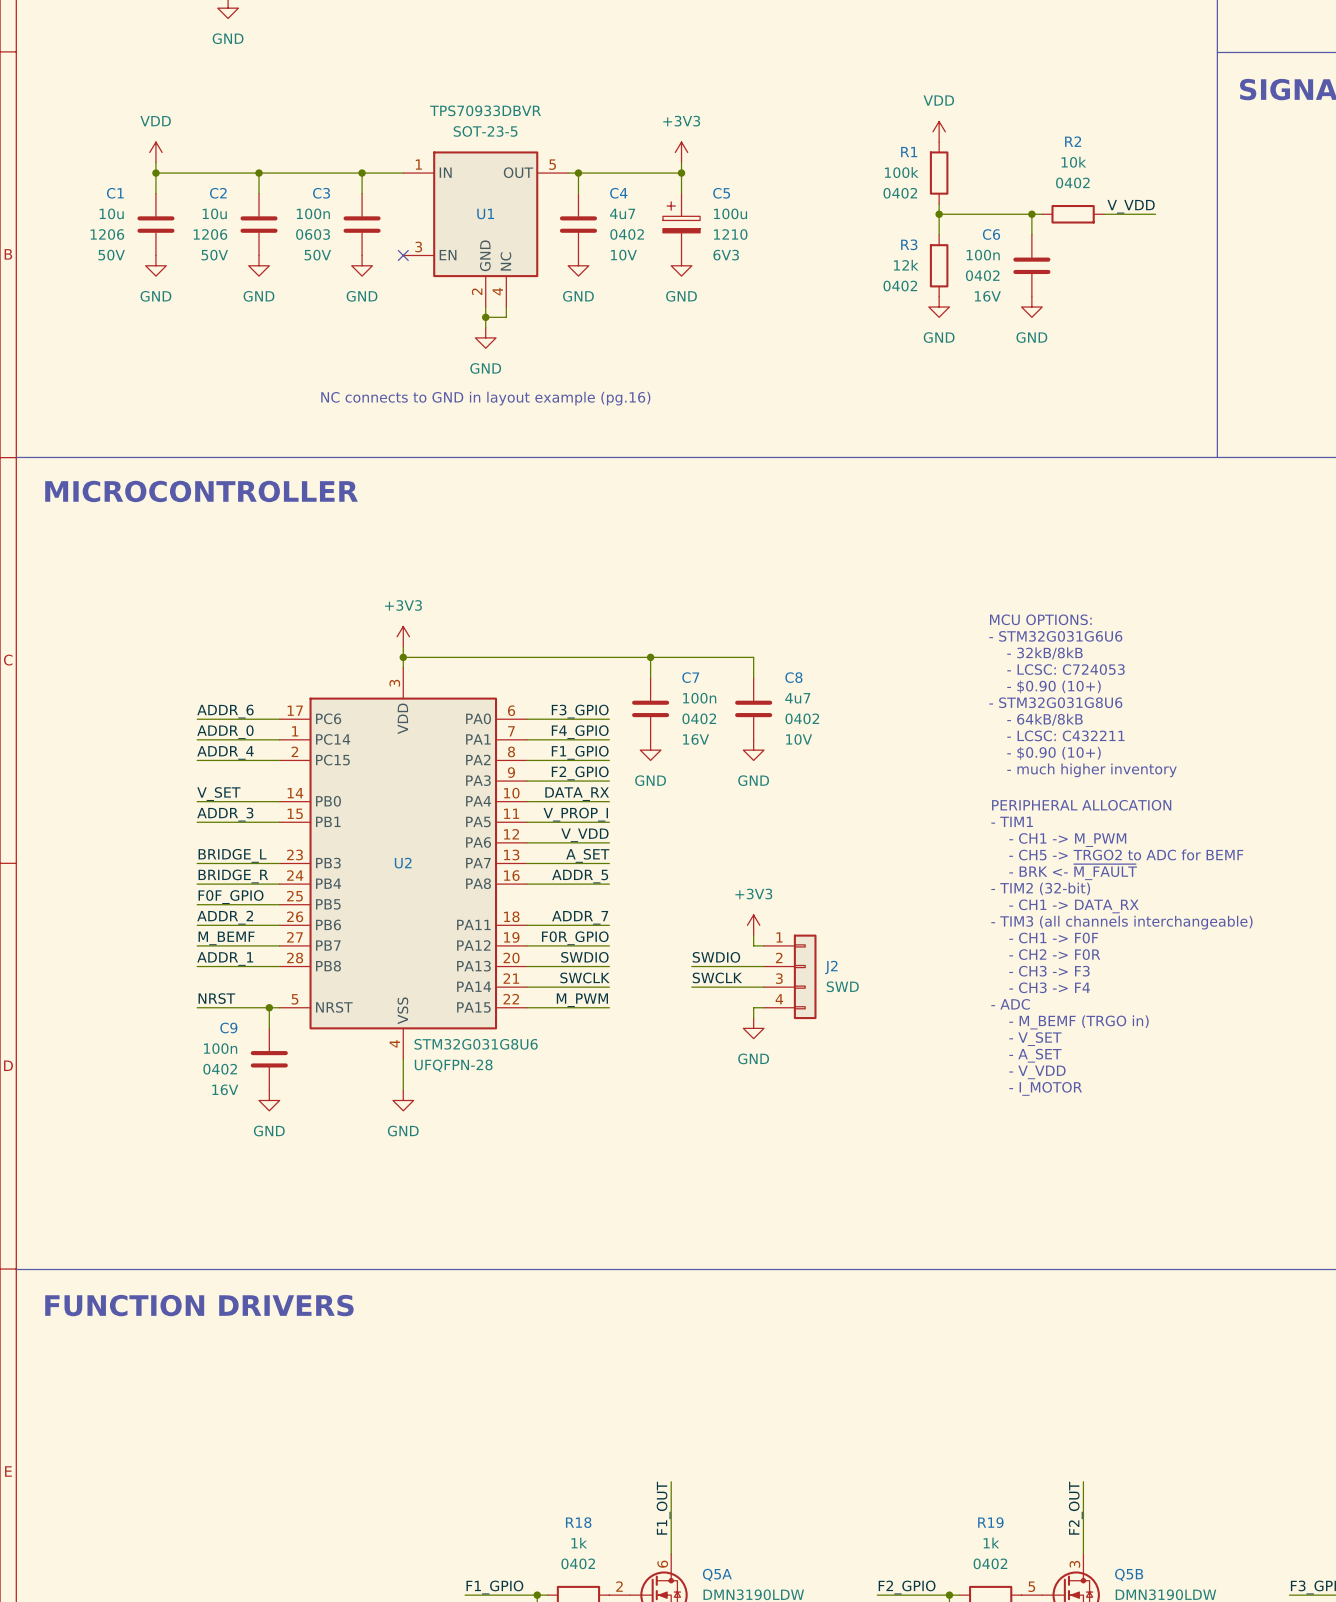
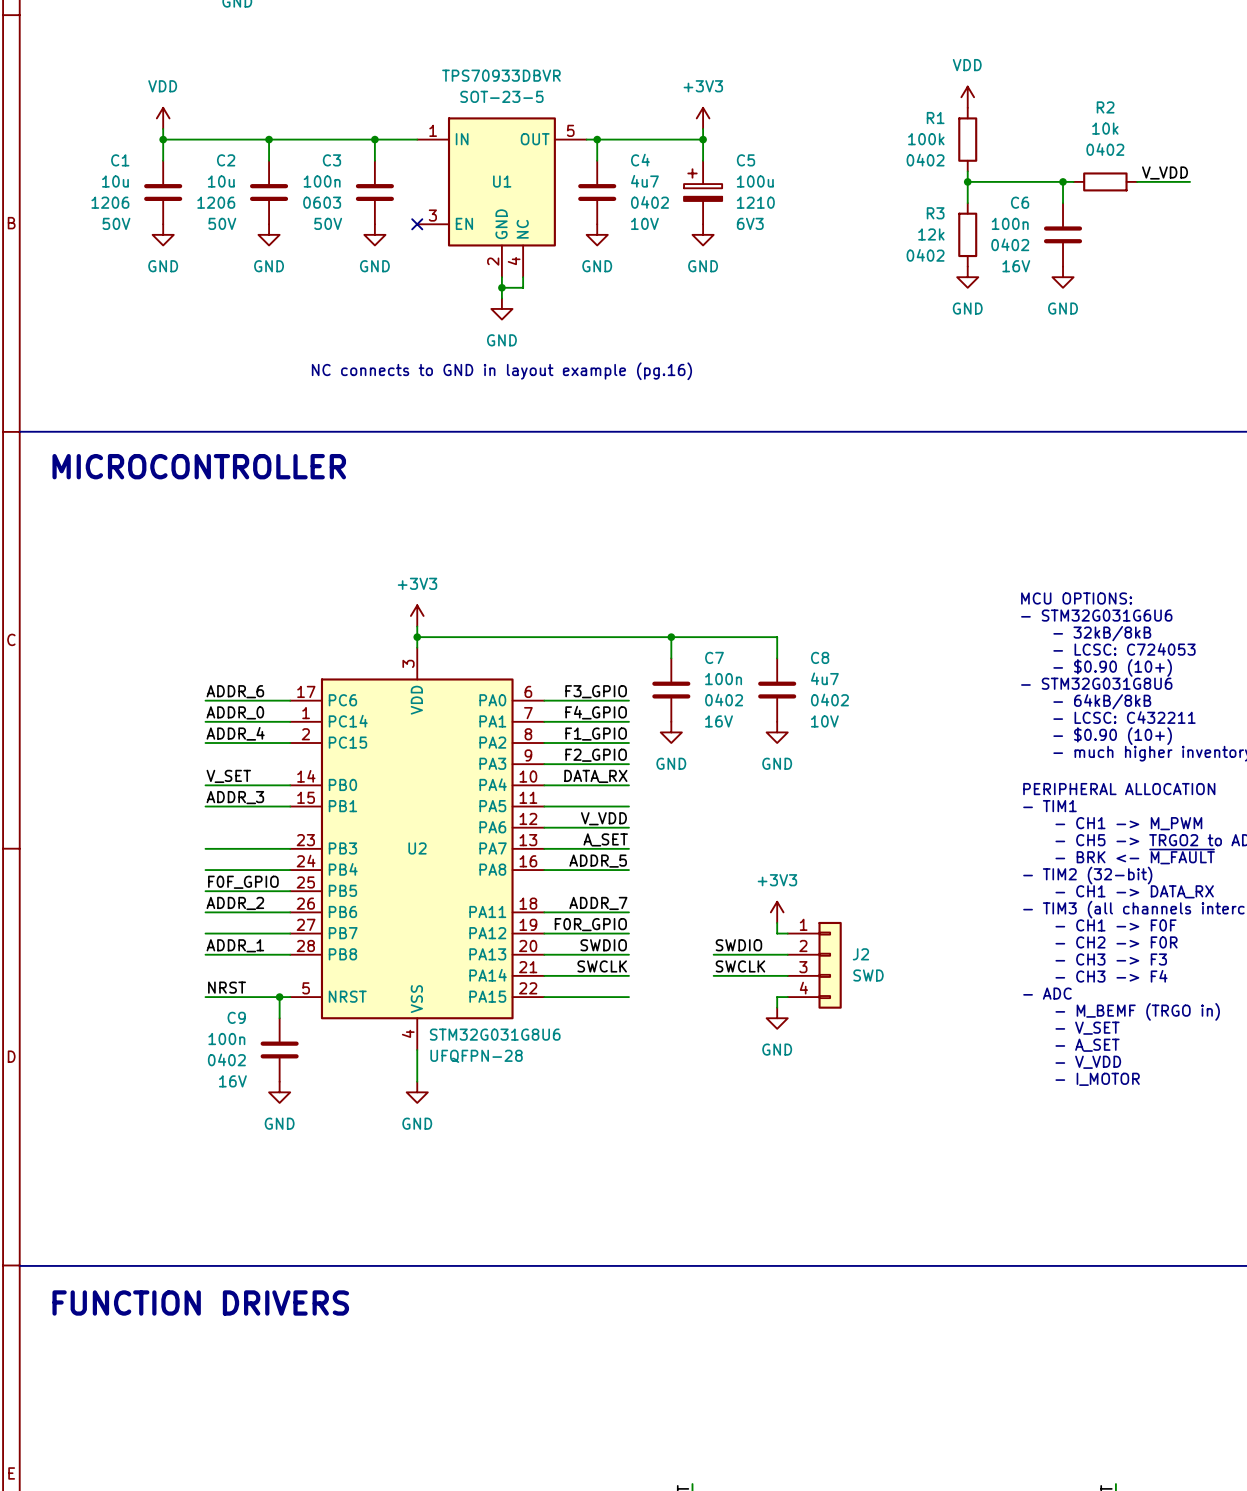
label: V_PROP_I (575, 814) -> none
label: BRIDGE_L (232, 855) -> none
label: BRIDGE_R (233, 876) -> none
label: M_BEMF (226, 938) -> none
label: M_PWM (582, 1000) -> none

